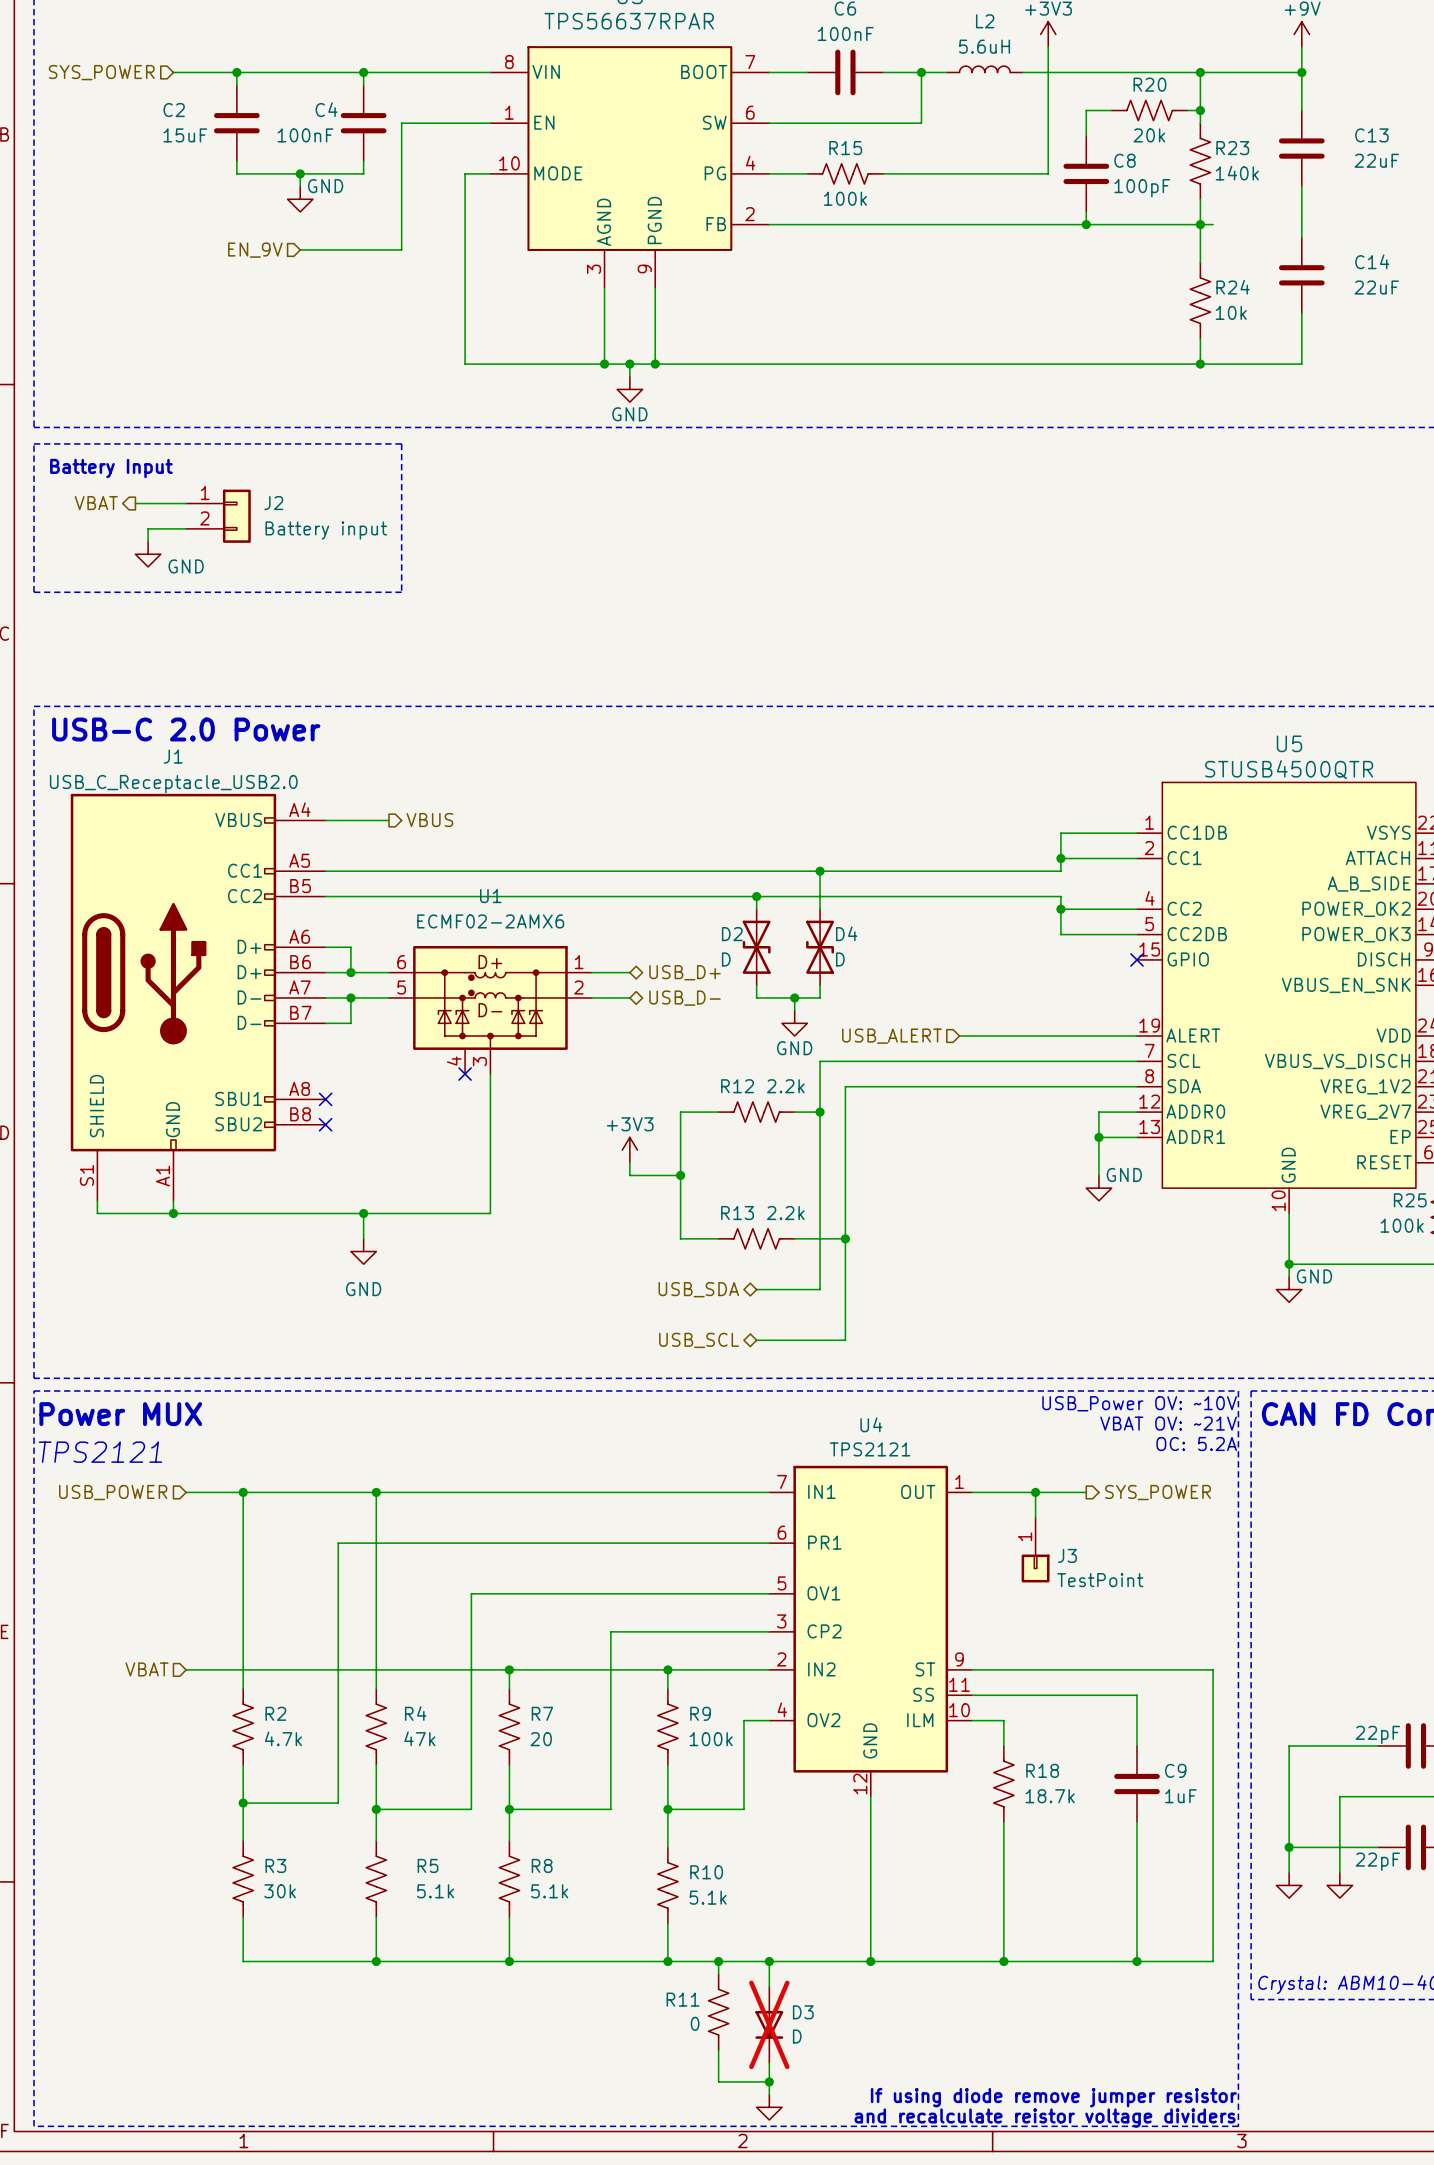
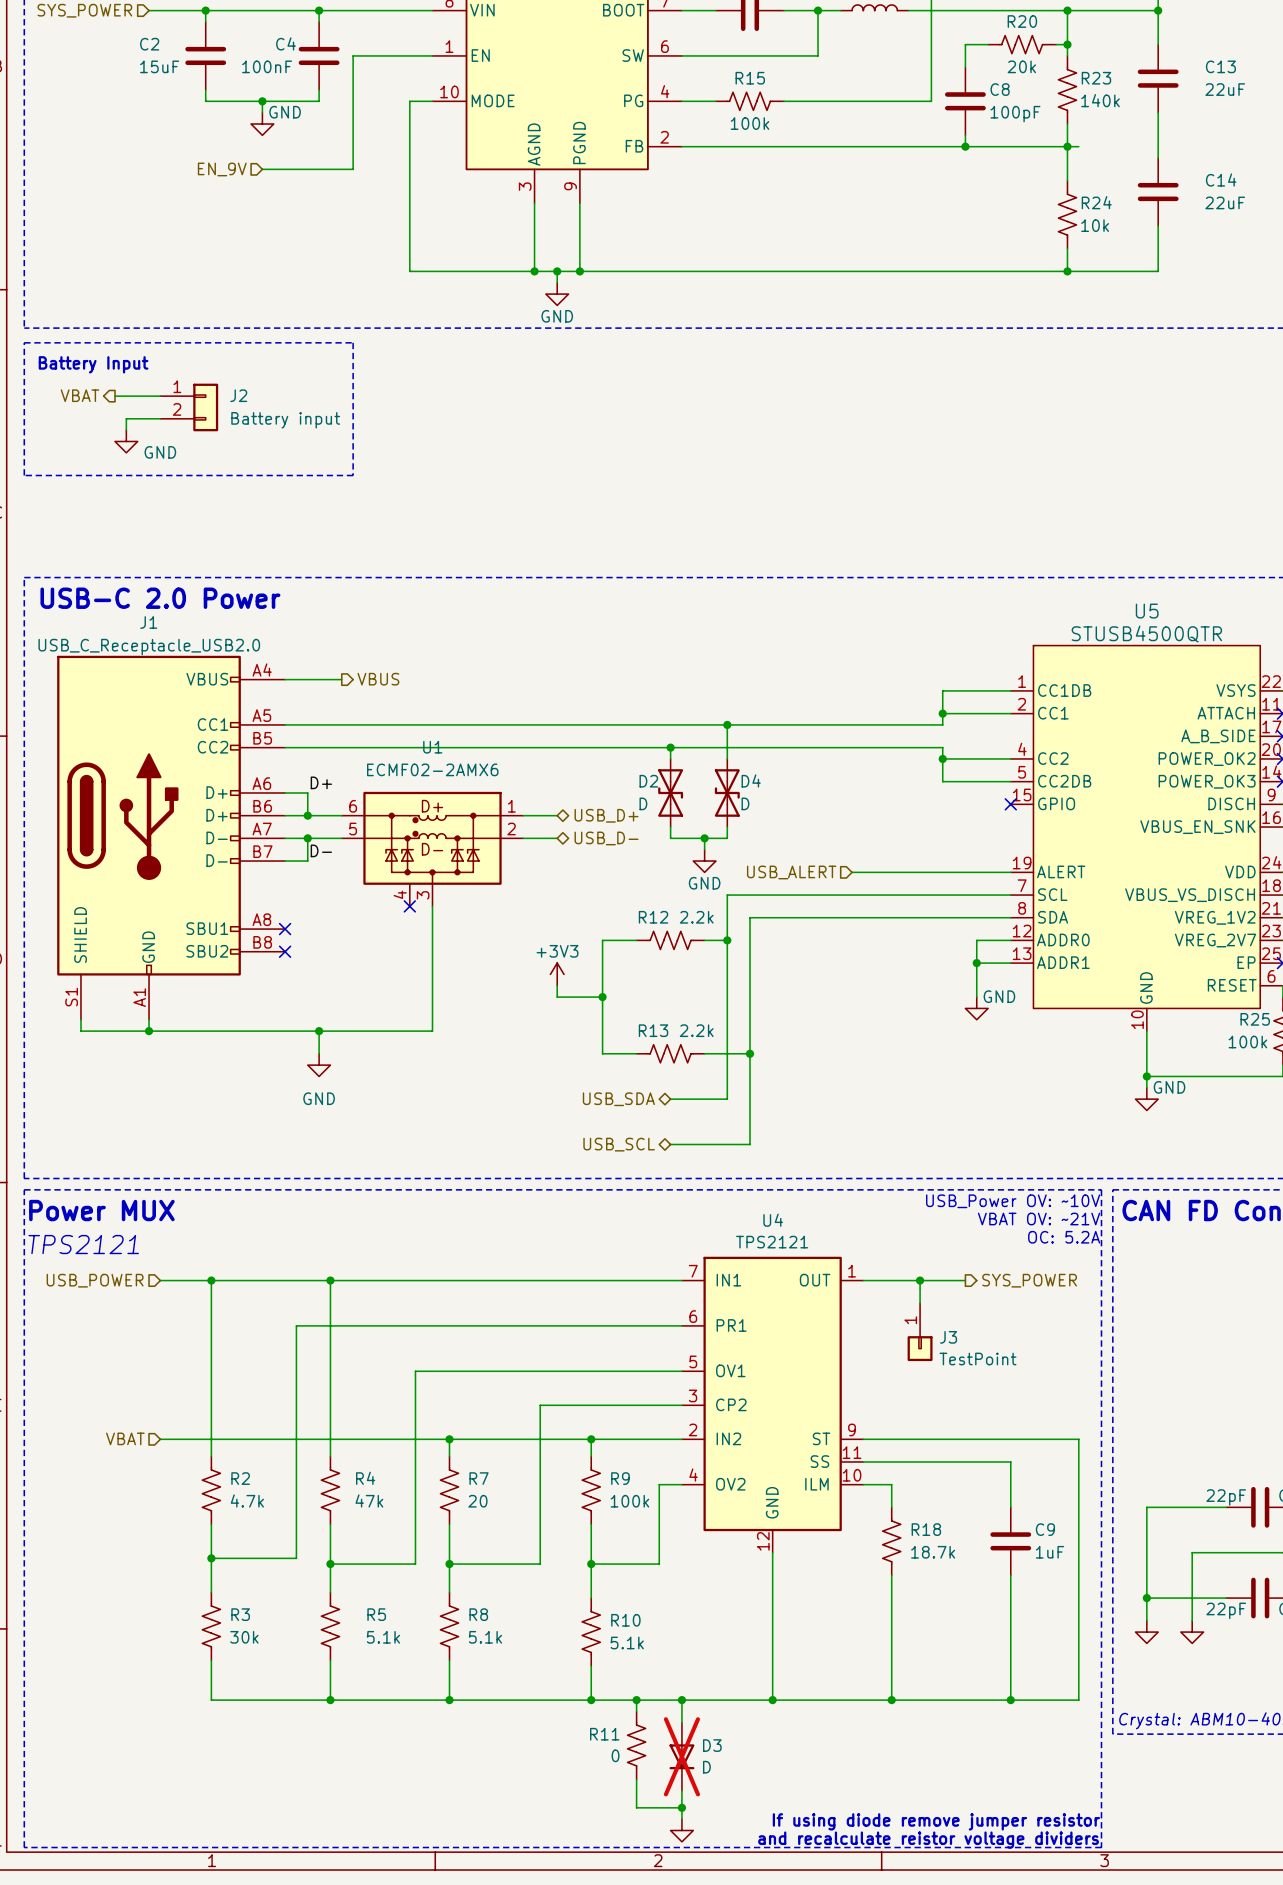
label: none -> D+ (321, 782)
label: none -> D- (321, 850)

